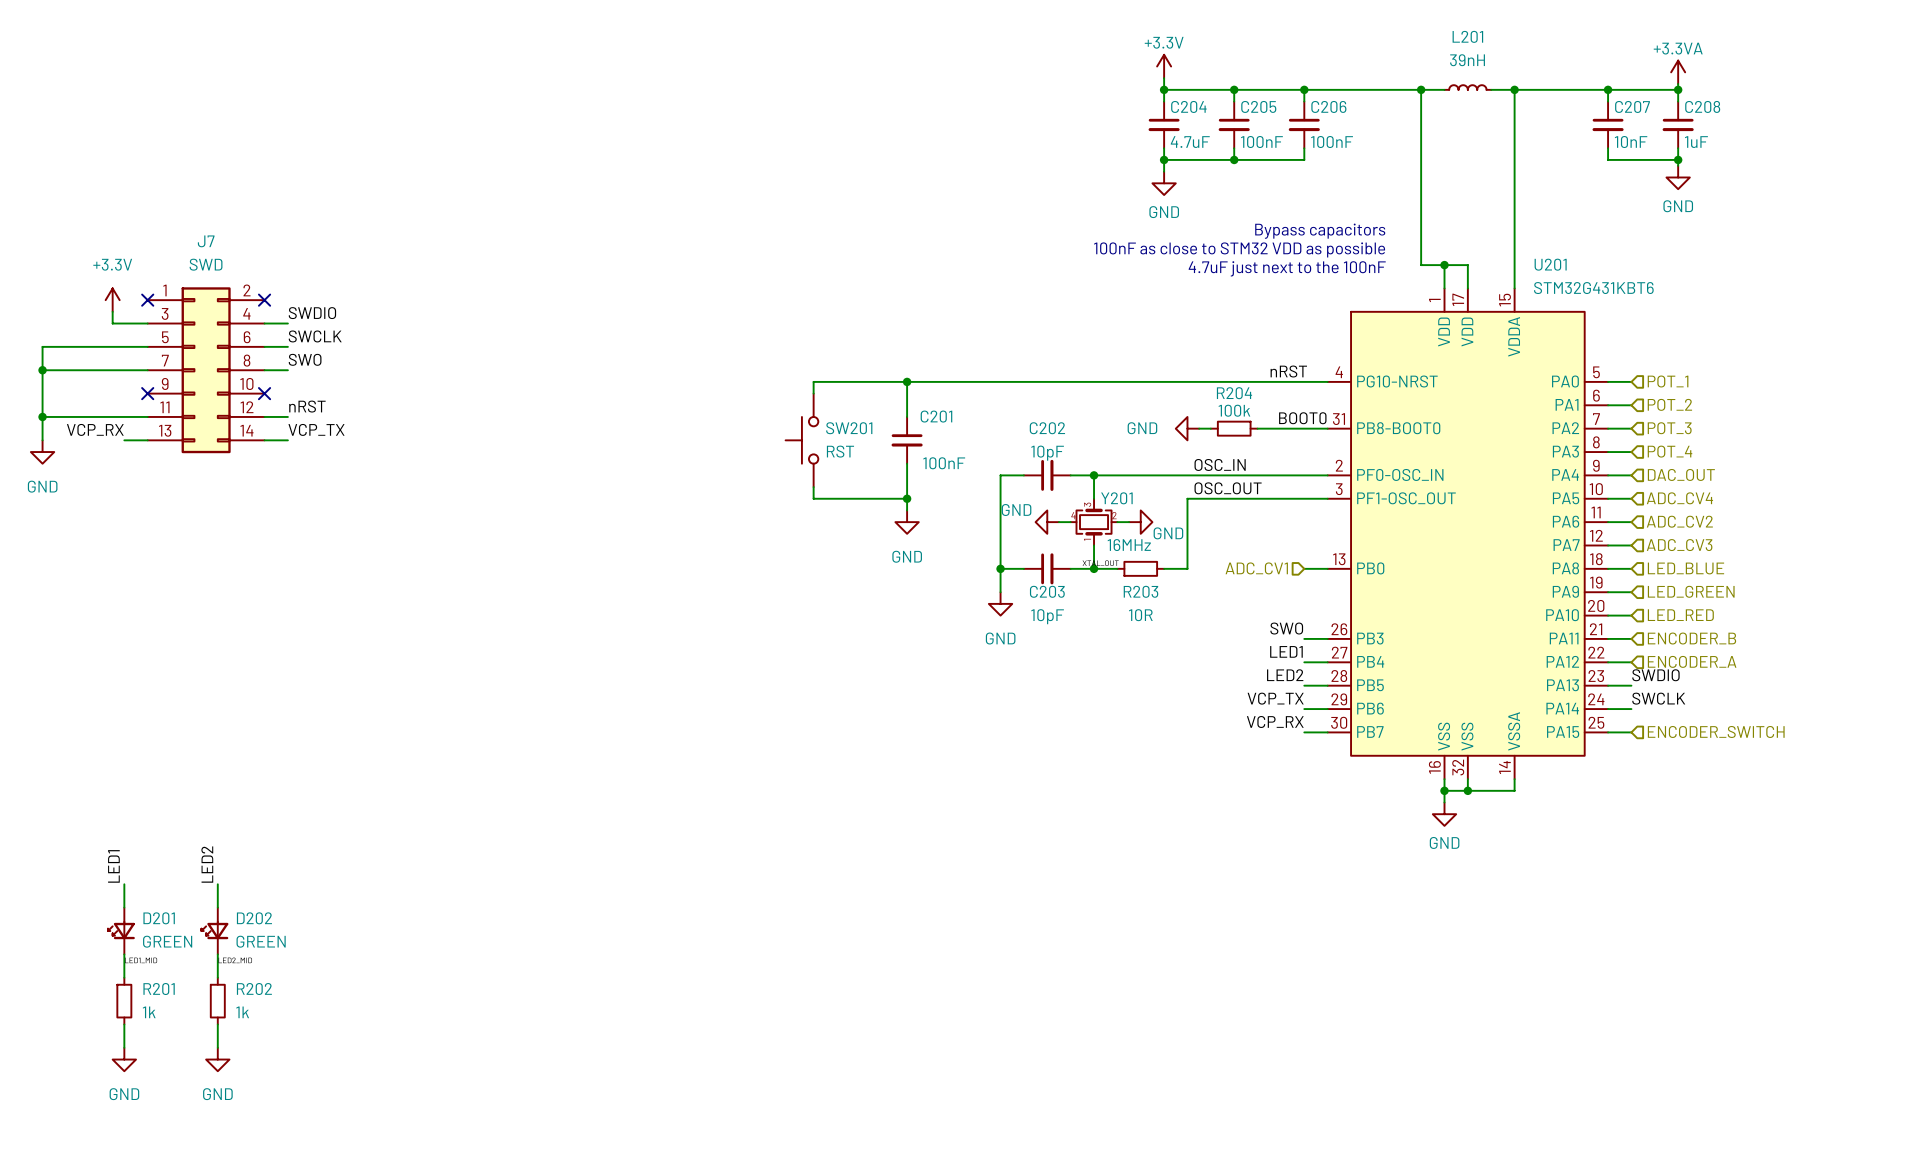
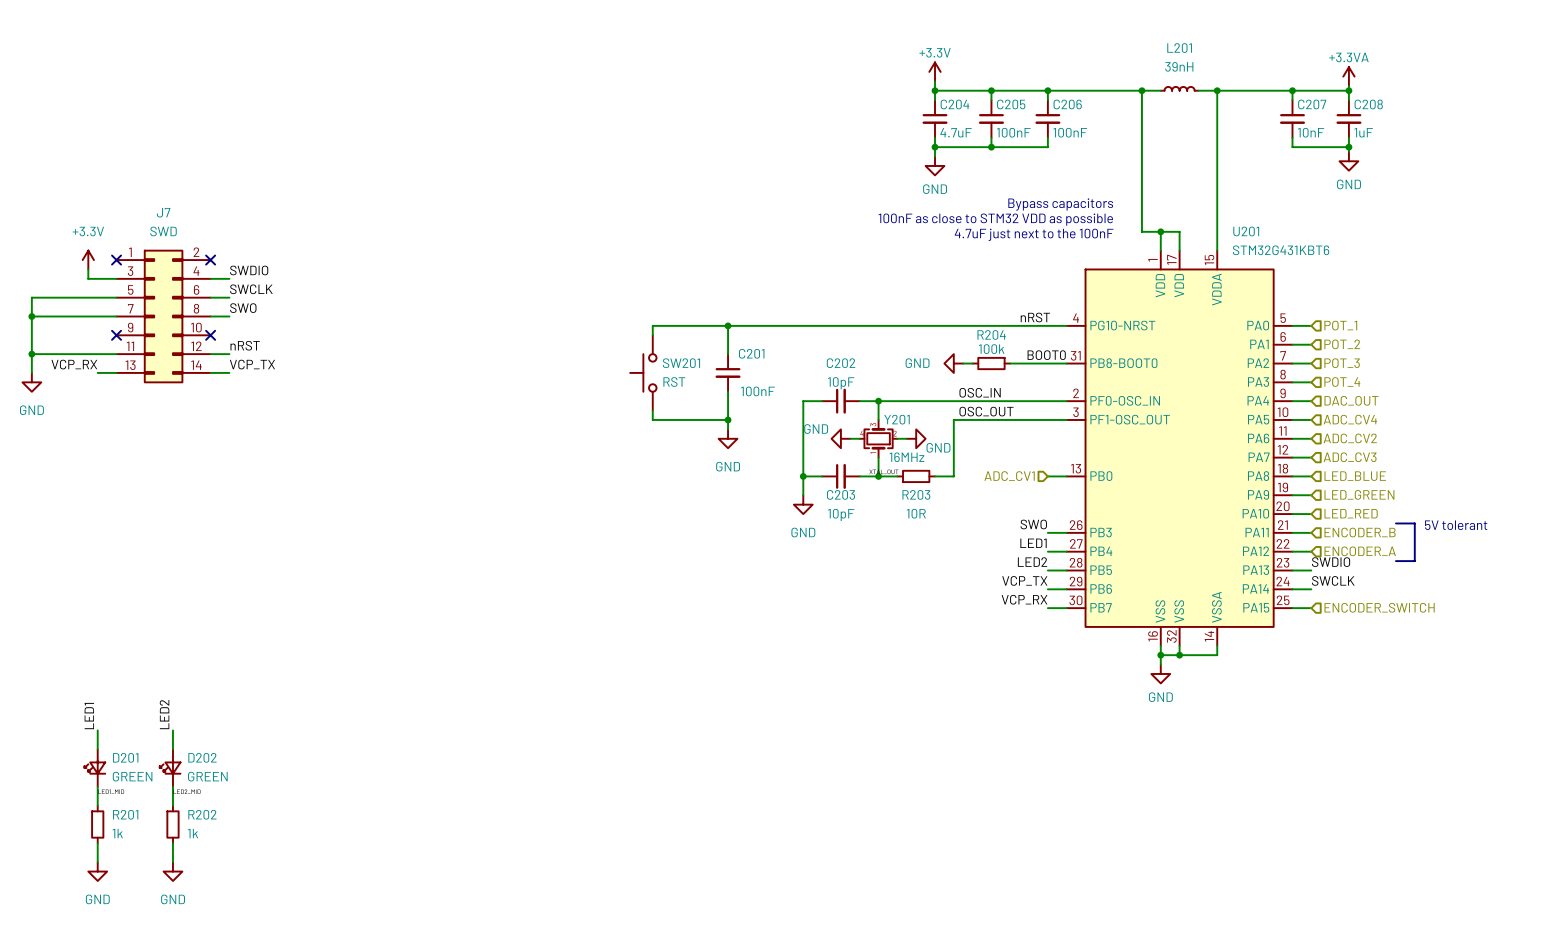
line: none -> (1395, 523) (1414, 523) (1414, 561) (1395, 561)
text: none -> 5V tolerant (1456, 525)

